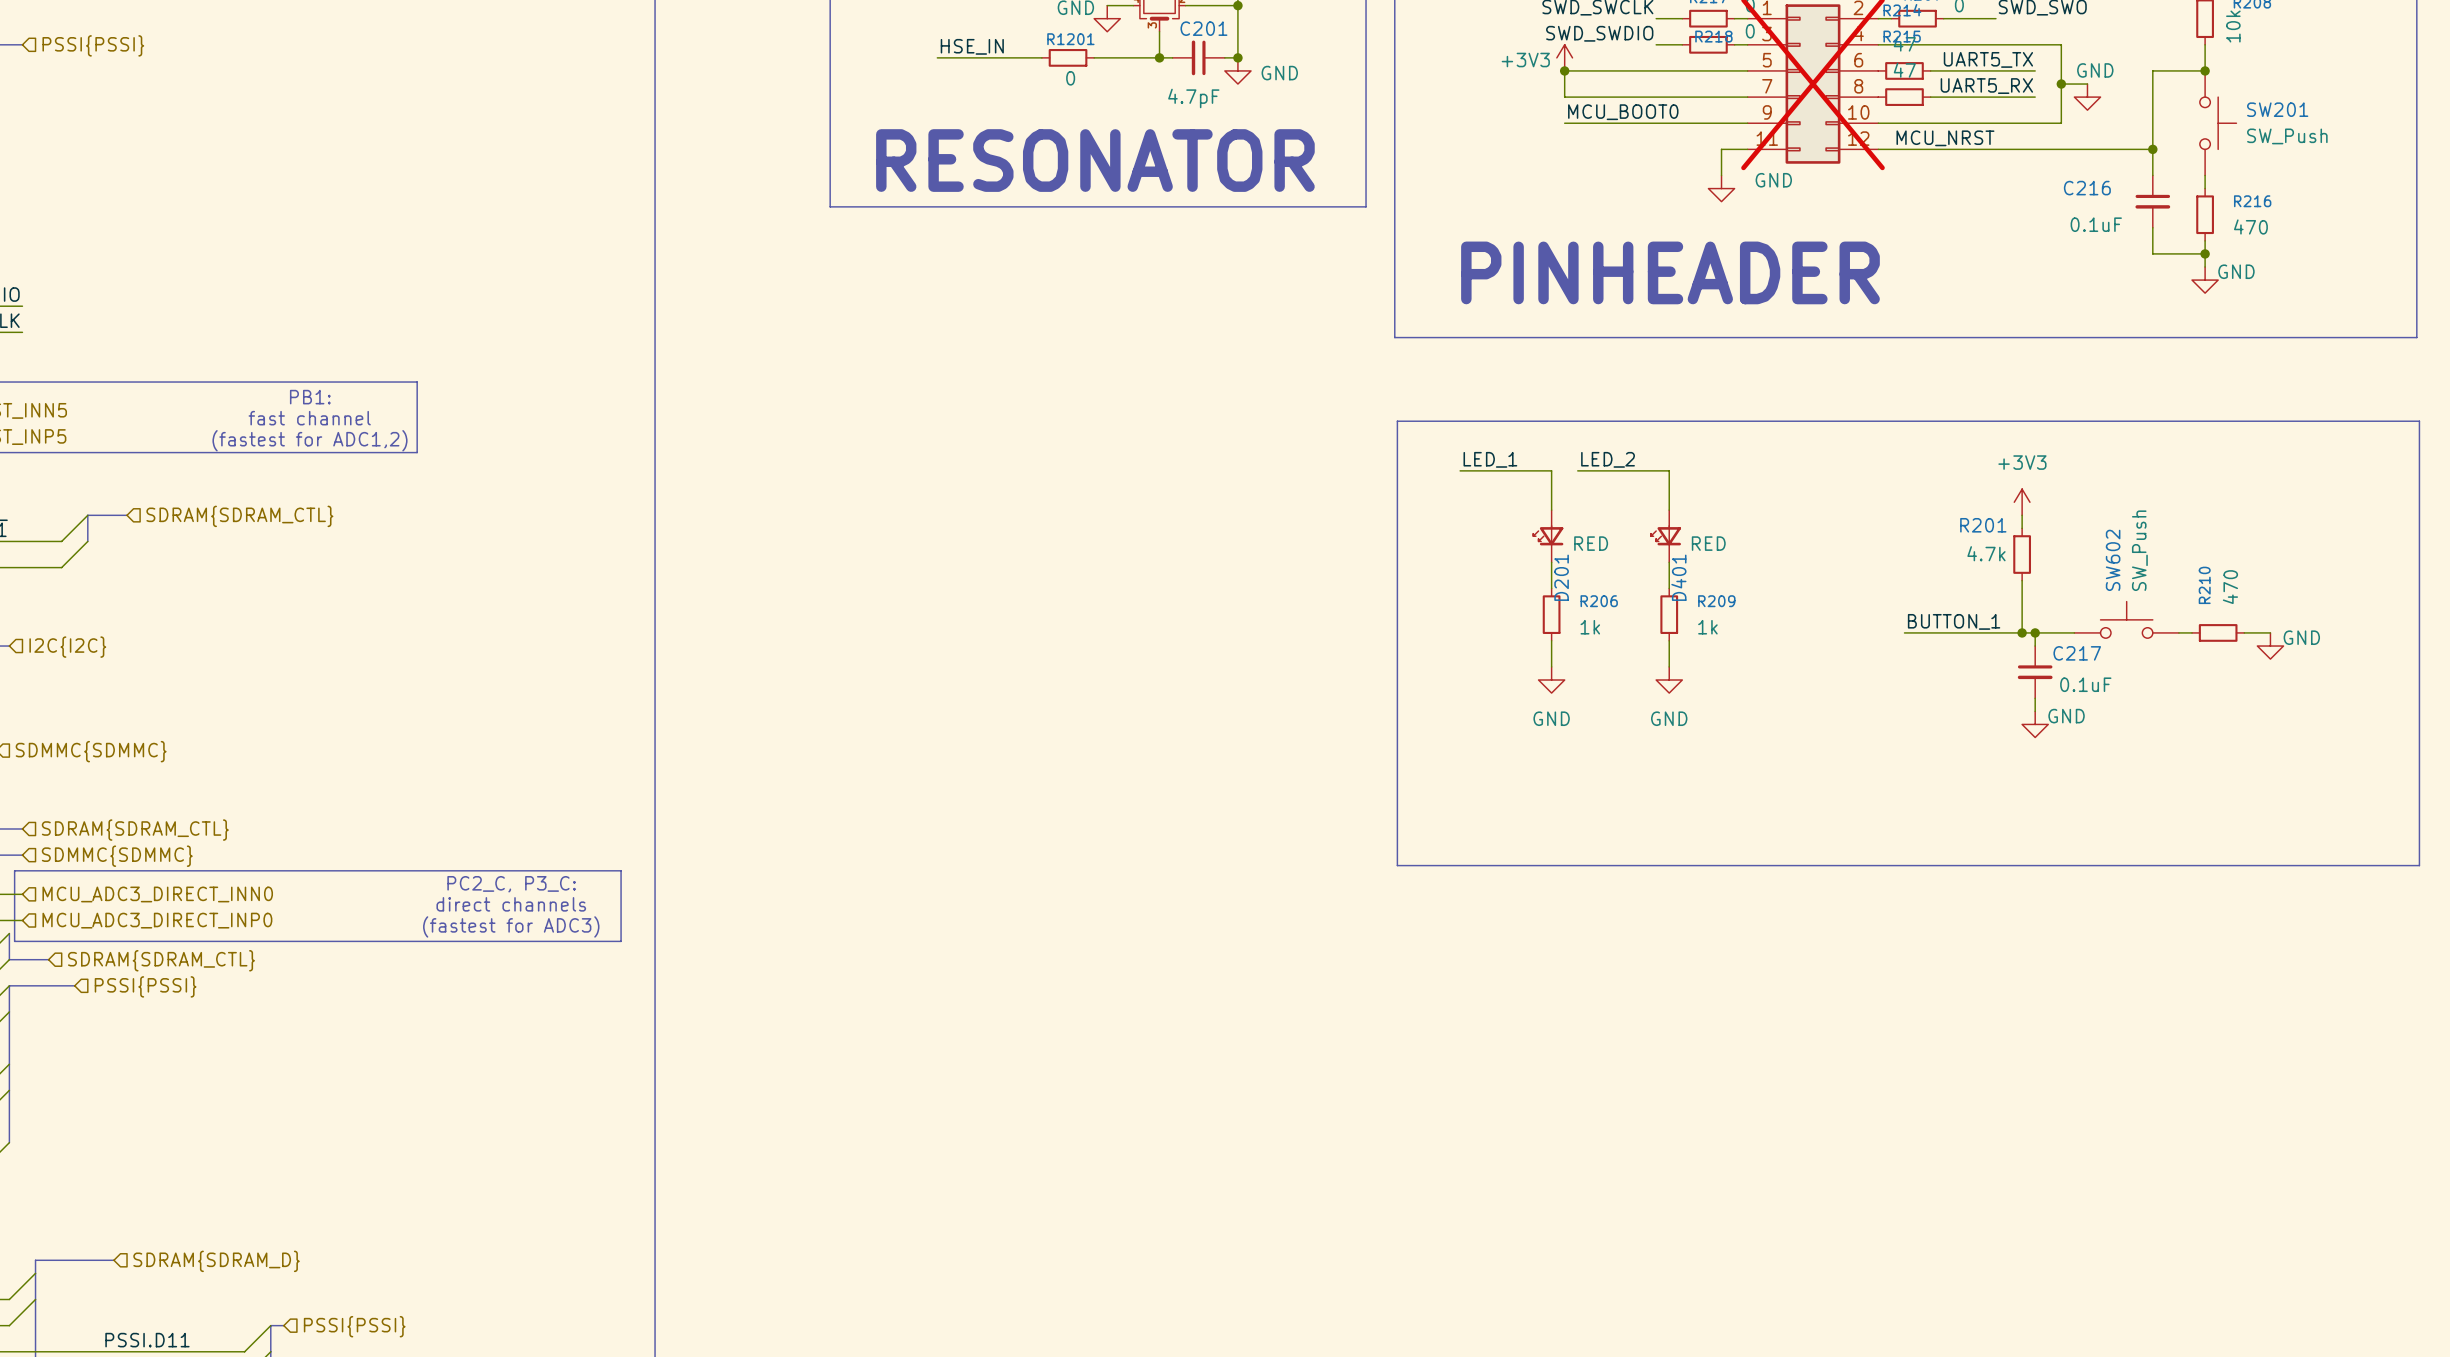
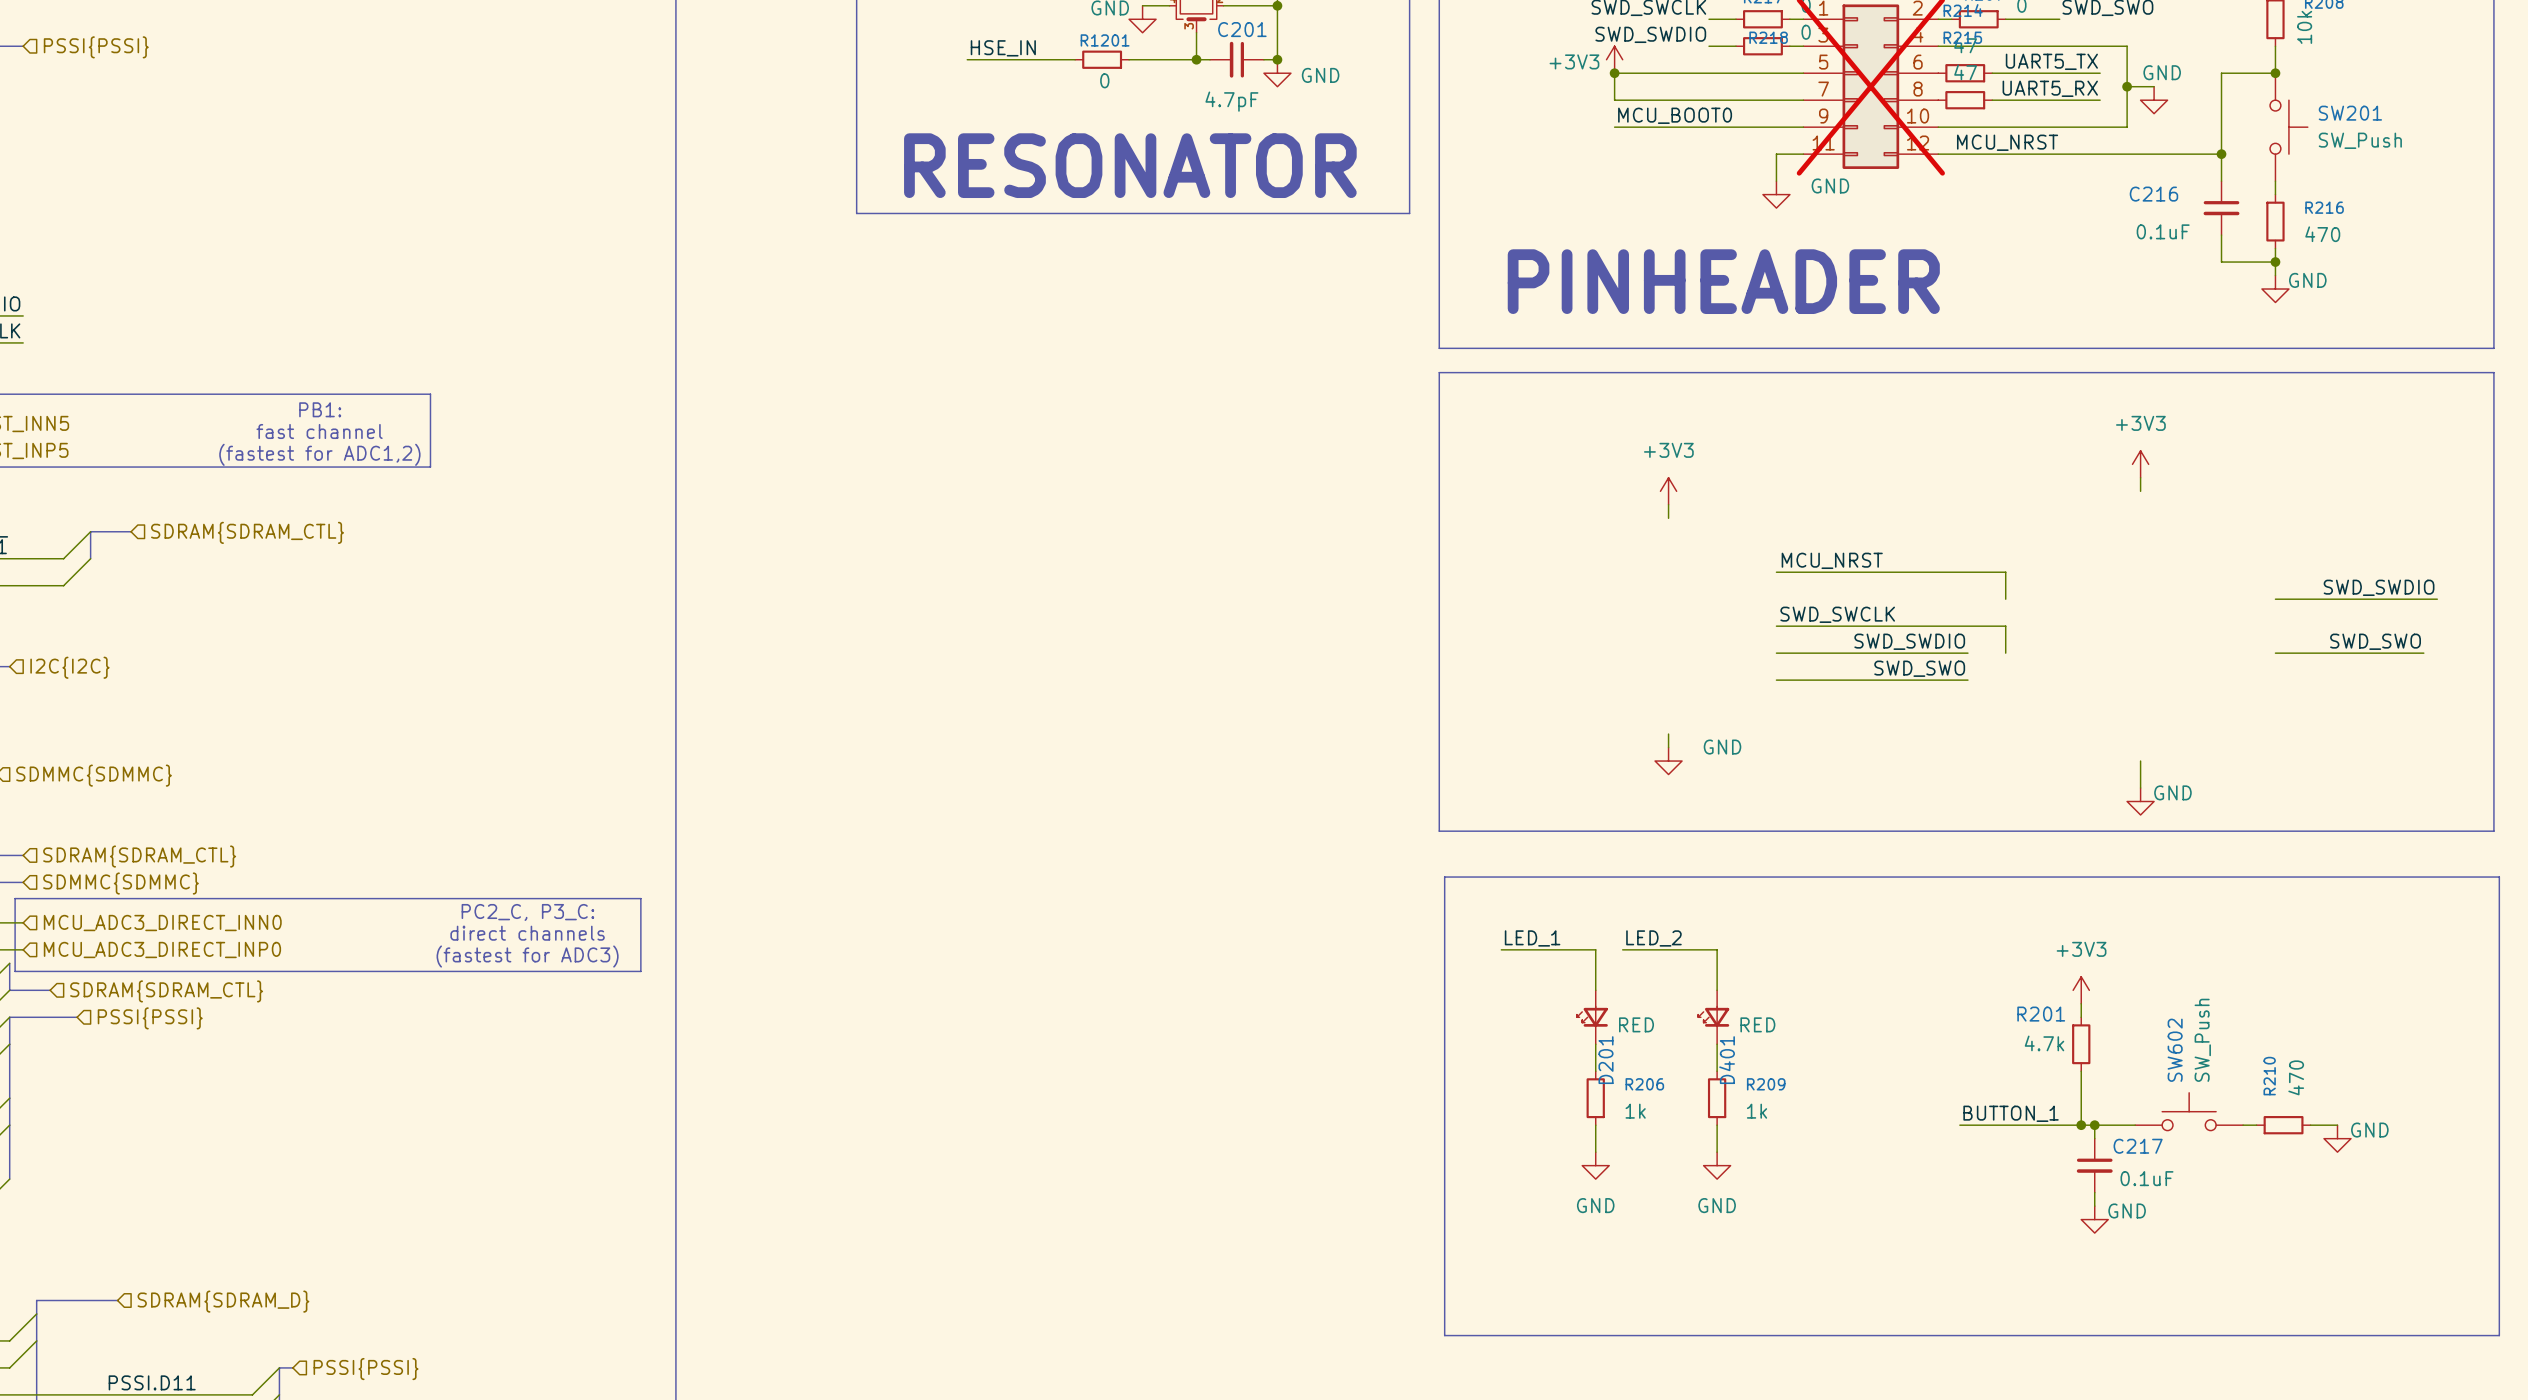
line: (1397, 421) (2419, 421) (2419, 865) (1397, 865) (1397, 421) -> (1439, 372) (2493, 372) (2493, 831) (1439, 831) (1439, 372)
label: LED_1 (1490, 459) -> none
label: LED_2 (1608, 459) -> none
wire: (1460, 470) (1551, 470) (1551, 510) -> none
wire: (1577, 470) (1669, 470) (1669, 510) -> none
power symbol: none -> +3V3 (1668, 491)
wire: none -> (1668, 504) (1668, 518)
power symbol position: +3V3 (2022, 502) -> +3V3 (2140, 464)
wire: (2022, 515) (2022, 528) -> (2140, 477) (2140, 491)
D201 position: (1548, 536) -> (1592, 1017)
D401 position: (1665, 536) -> (1713, 1017)
label: none -> MCU_NRST (1832, 560)
wire: none -> (1776, 572) (2005, 572) (2005, 599)
R201 position: (2022, 554) -> (2081, 1044)
wire: (1551, 562) (1551, 588) -> none
wire: (1669, 562) (1669, 588) -> none
label: none -> SWD_SWDIO (2379, 587)
wire: (2022, 580) (2022, 632) -> none
wire: none -> (2275, 599) (2437, 599)
label: none -> SWD_SWCLK (1837, 614)
wire: none -> (1776, 626) (2005, 626) (2005, 653)
R206 position: (1551, 614) -> (1595, 1098)
R209 position: (1669, 614) -> (1717, 1098)
SW602 position: (2126, 619) -> (2189, 1111)
label: BUTTON_1 (1954, 621) -> SWD_SWDIO (1909, 641)
label: none -> SWD_SWO (2375, 641)
wire: none -> (1776, 653) (1965, 653)
wire: (1907, 632) (2074, 632) -> none
junction: (2022, 632) -> none
wire: (2035, 632) (2035, 646) -> none
junction: (2035, 632) -> none
wire: (2178, 632) (2192, 632) -> none
wire: none -> (2275, 653) (2315, 653)
R210 position: (2218, 632) -> (2283, 1125)
wire: none -> (2342, 653) (2423, 653)
wire: (1551, 640) (1551, 666) -> none
wire: (1669, 640) (1669, 666) -> none
power symbol: GND (2270, 646) -> none
label: none -> SWD_SWO (1919, 668)
wire: none -> (1776, 680) (1967, 680)
C217 position: (2035, 672) -> (2094, 1165)
power symbol: GND (1551, 680) -> none
power symbol: GND (1669, 680) -> none
wire: (2035, 698) (2035, 711) -> none
wire: none -> (1668, 734) (1668, 747)
power symbol position: GND (2035, 724) -> GND (2140, 801)
power symbol: none -> GND (1668, 761)
wire: none -> (2140, 761) (2140, 788)
line: none -> (1444, 877) (2499, 877) (2499, 1335) (1444, 1335) (1444, 877)
label: none -> LED_1 (1532, 938)
label: none -> LED_2 (1653, 938)
wire: none -> (1501, 949) (1595, 949) (1595, 990)
wire: none -> (1622, 949) (1717, 949) (1717, 990)
power symbol: none -> +3V3 (2081, 990)
wire: none -> (2081, 1003) (2081, 1017)
wire: none -> (1595, 1044) (1595, 1071)
wire: none -> (1717, 1044) (1717, 1071)
wire: none -> (2081, 1071) (2081, 1125)
label: none -> BUTTON_1 (2011, 1113)
wire: none -> (1595, 1125) (1595, 1152)
wire: none -> (1717, 1125) (1717, 1152)
wire: none -> (1959, 1125) (2135, 1125)
junction: none -> (2081, 1125)
wire: none -> (2094, 1125) (2094, 1138)
junction: none -> (2094, 1125)
wire: none -> (2243, 1125) (2256, 1125)
wire: none -> (2310, 1125) (2337, 1125)
power symbol: none -> GND (2337, 1138)
power symbol: none -> GND (1595, 1165)
power symbol: none -> GND (1717, 1165)
wire: none -> (2094, 1192) (2094, 1206)
power symbol: none -> GND (2094, 1219)

